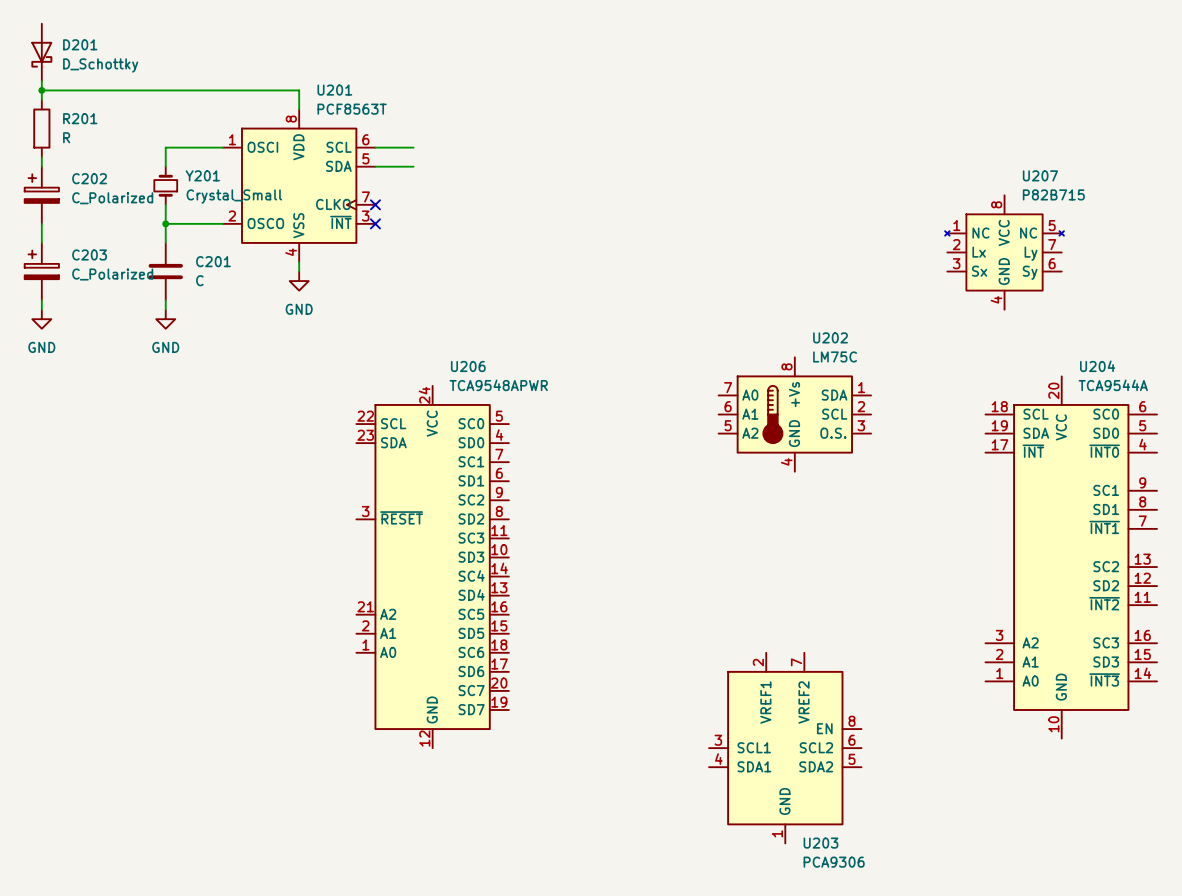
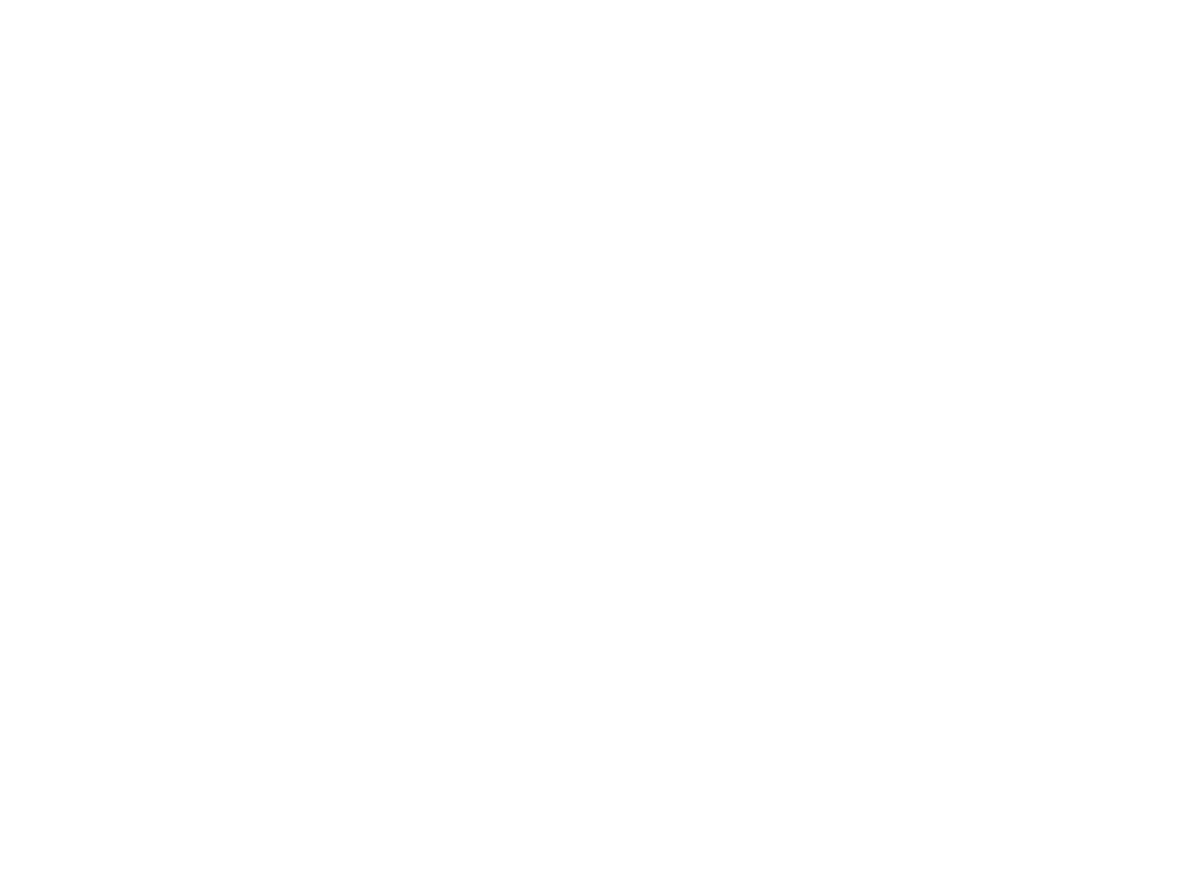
D201: D_Schottky (41, 52) -> none
wire: (41, 80) (41, 99) -> none
wire: (41, 90) (299, 90) (299, 109) -> none
junction: (41, 90) -> none
R201: R (41, 128) -> none
wire: (222, 147) (165, 147) (165, 166) -> none
wire: (375, 147) (413, 147) -> none
wire: (41, 157) (41, 166) -> none
wire: (375, 166) (413, 166) -> none
Y201: Crystal_Small (165, 185) -> none
U201: PCF8563T (299, 185) -> none
C202: C_Polarized (41, 195) -> none
wire: (165, 204) (165, 242) -> none
no-connect mark: (375, 204) -> none
wire: (41, 223) (41, 242) -> none
wire: (165, 223) (222, 223) -> none
junction: (165, 223) -> none
no-connect mark: (375, 223) -> none
U207: P82B715 (1004, 252) -> none
wire: (299, 262) (299, 271) -> none
C203: C_Polarized (41, 271) -> none
C201: C (165, 271) -> none
power symbol: GND (299, 281) -> none
wire: (41, 300) (41, 309) -> none
wire: (165, 300) (165, 309) -> none
power symbol: GND (41, 319) -> none
power symbol: GND (165, 319) -> none
U202: LM75C (794, 414) -> none
U204: TCA9544A (1071, 557) -> none
U206: TCA9548APWR (432, 567) -> none
U203: PCA9306 (785, 748) -> none

